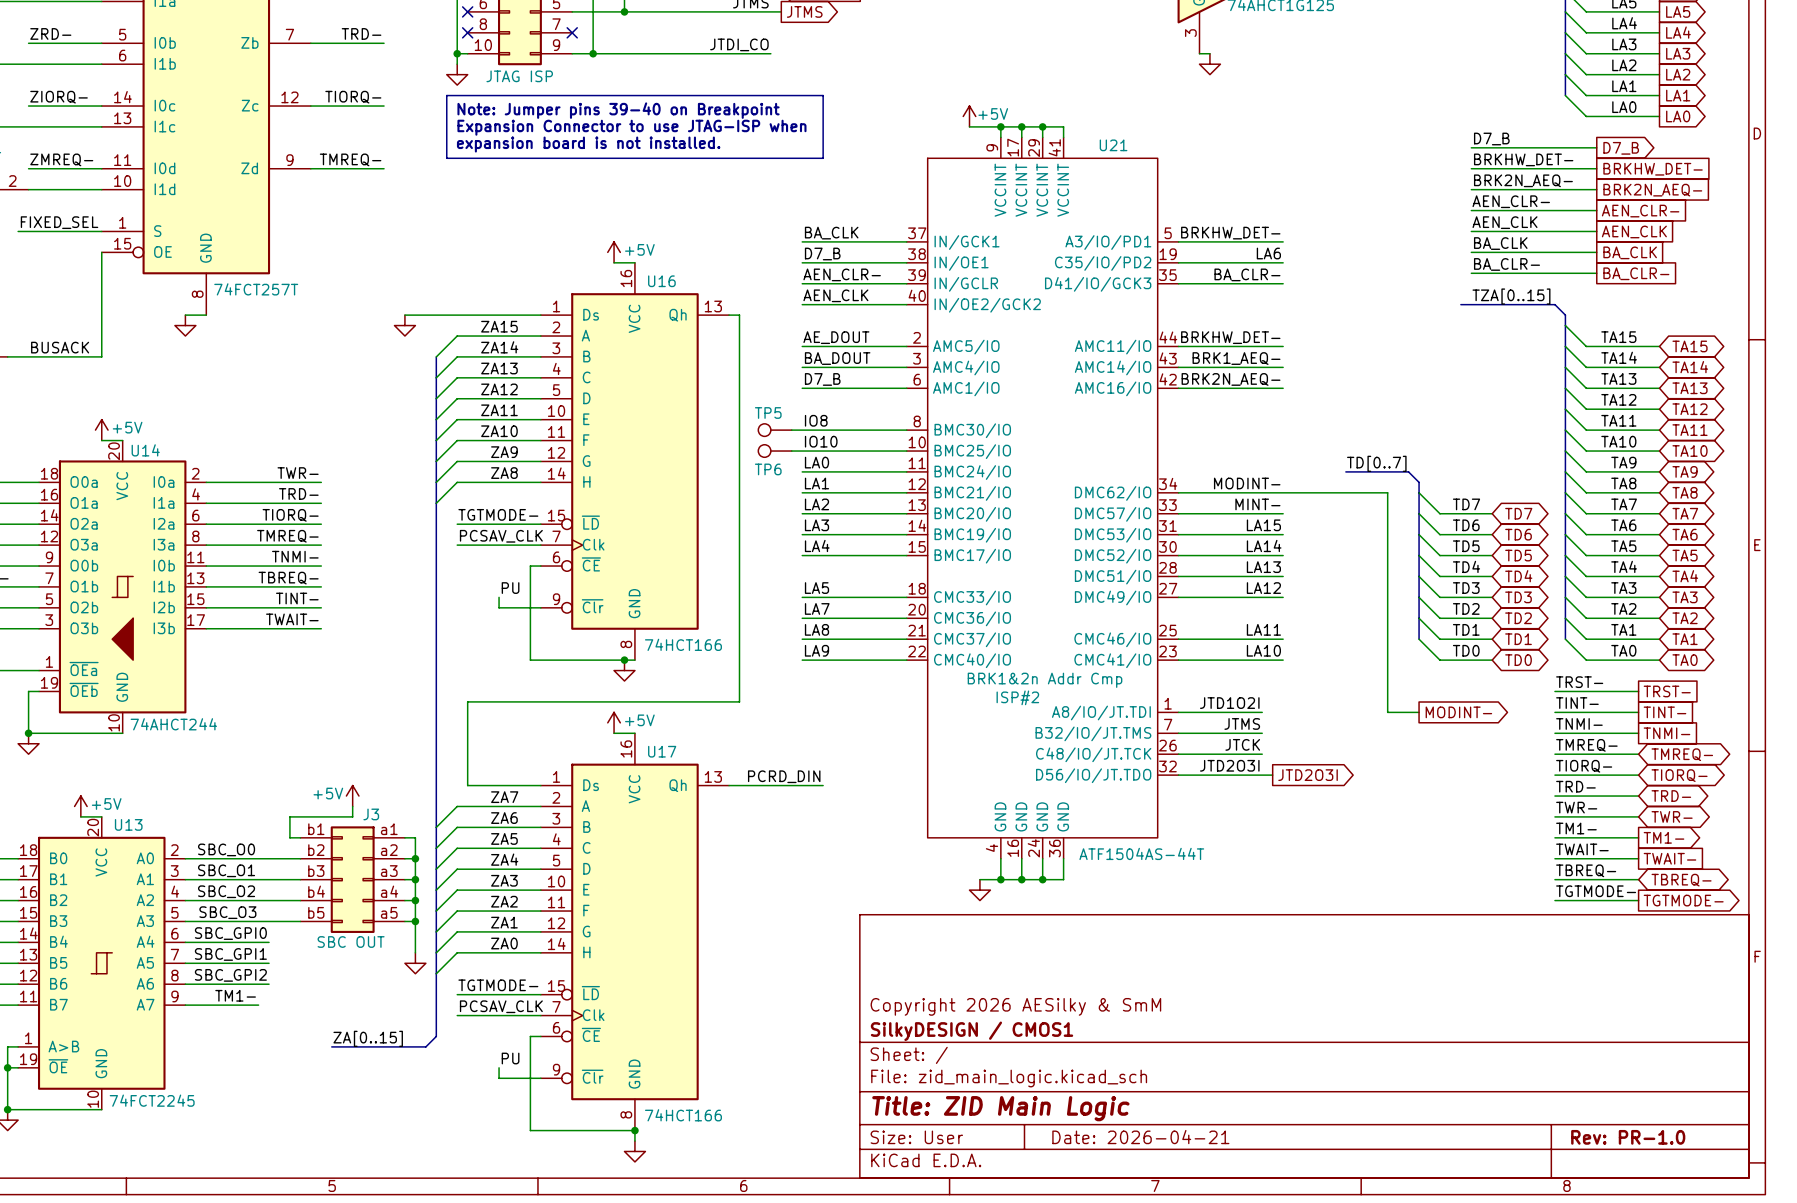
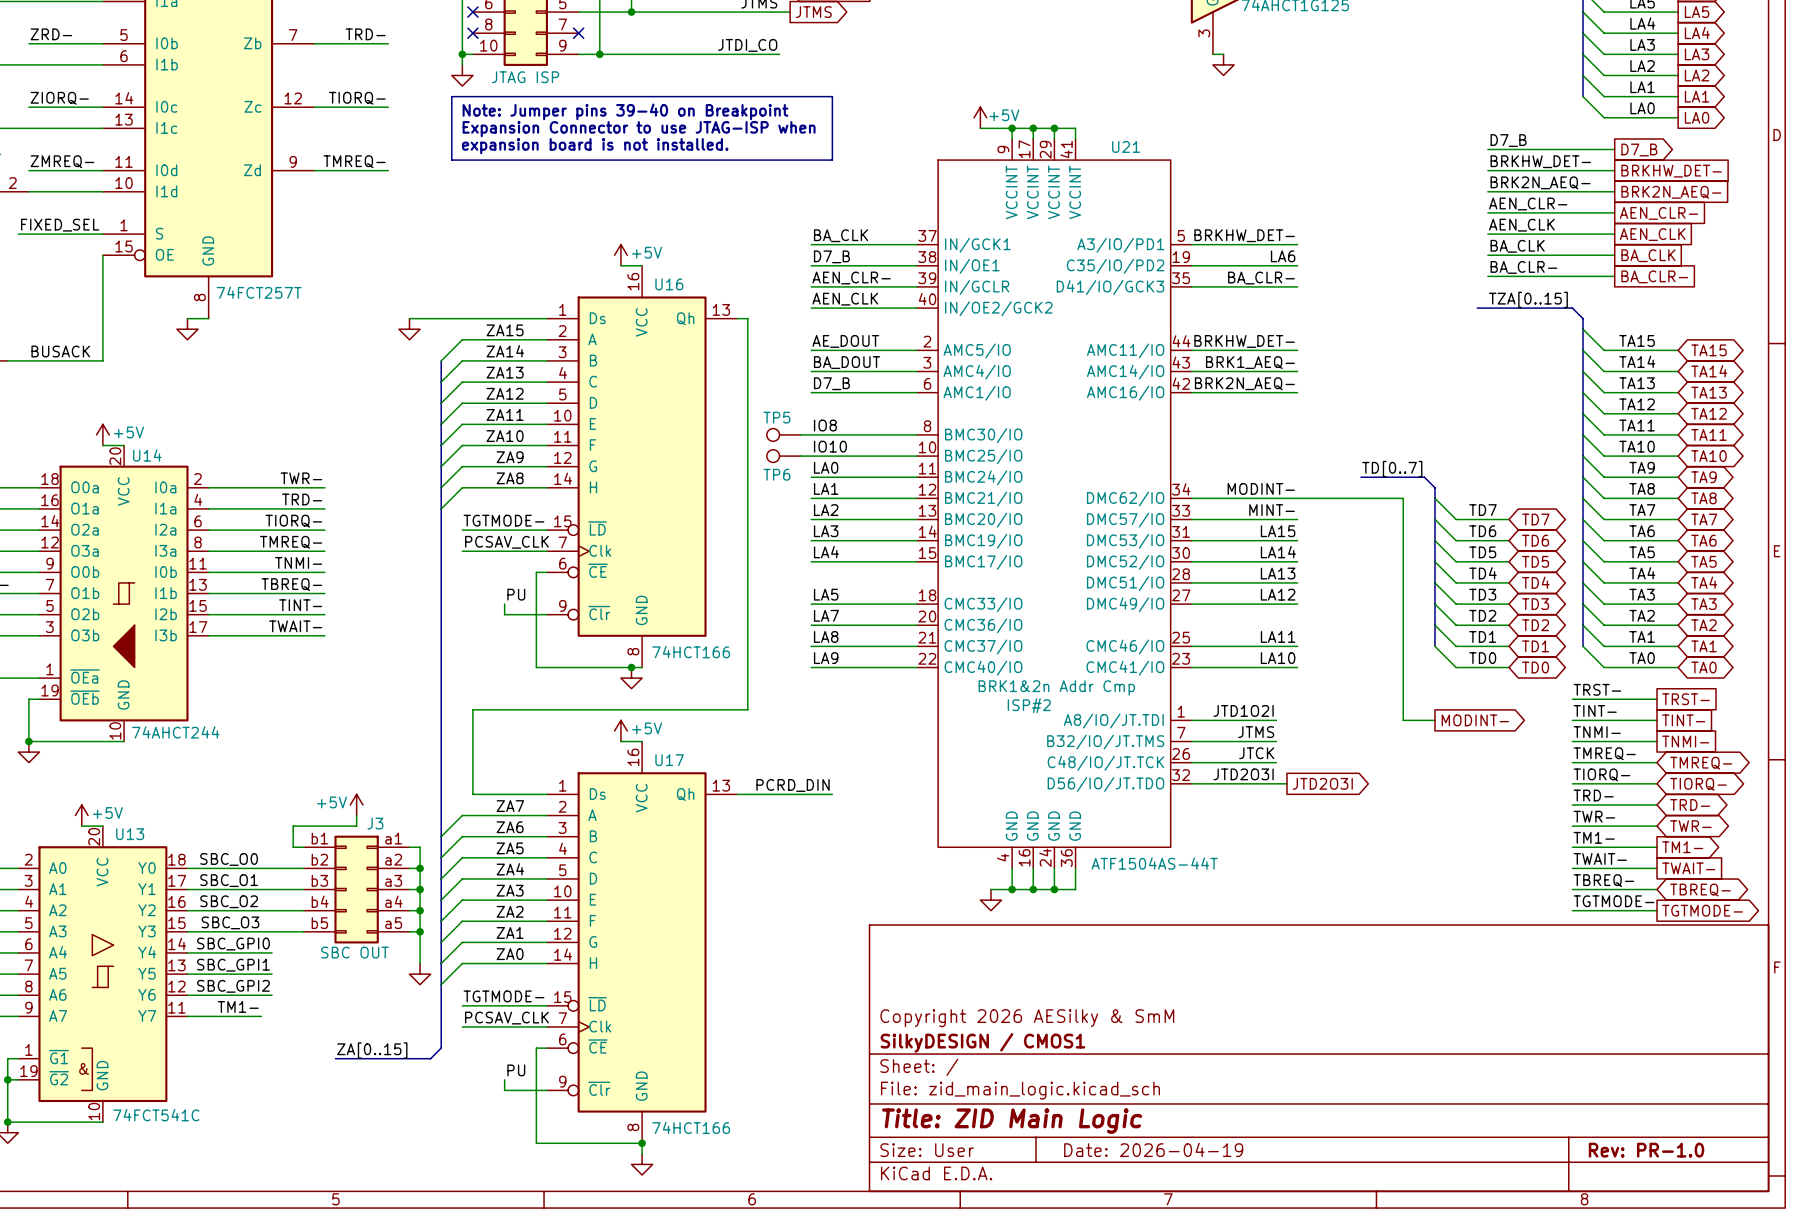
U13 symbol: [18, 816, 186, 1110] -> [18, 826, 188, 1123]
U13 value: 74FCT2245 (152, 1100) -> 74FCT541C (156, 1115)
title block: Date: 2026-04-21 (1140, 1137) -> Date: 2026-04-19 (1153, 1149)

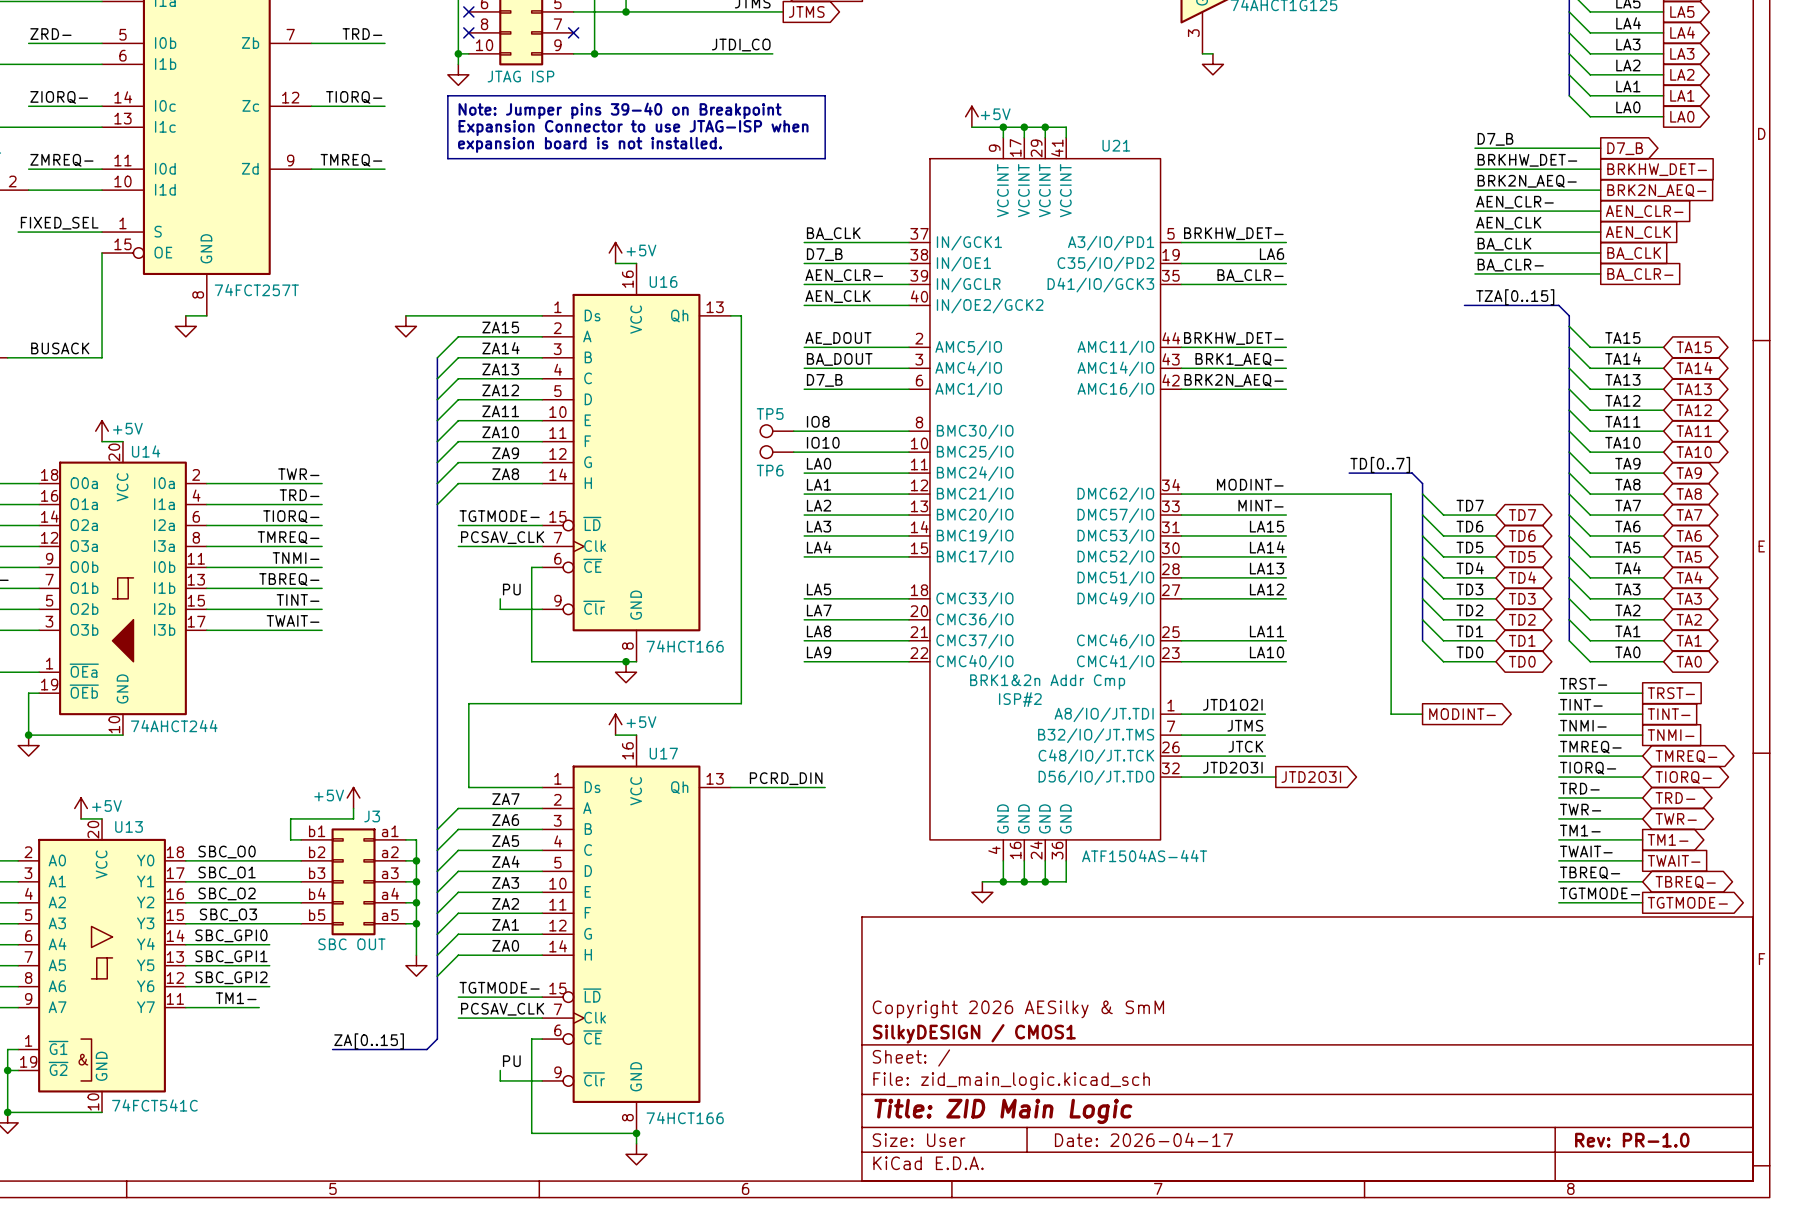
title block: Date: 2026-04-19 (1153, 1149) -> Date: 2026-04-17 (1143, 1139)

